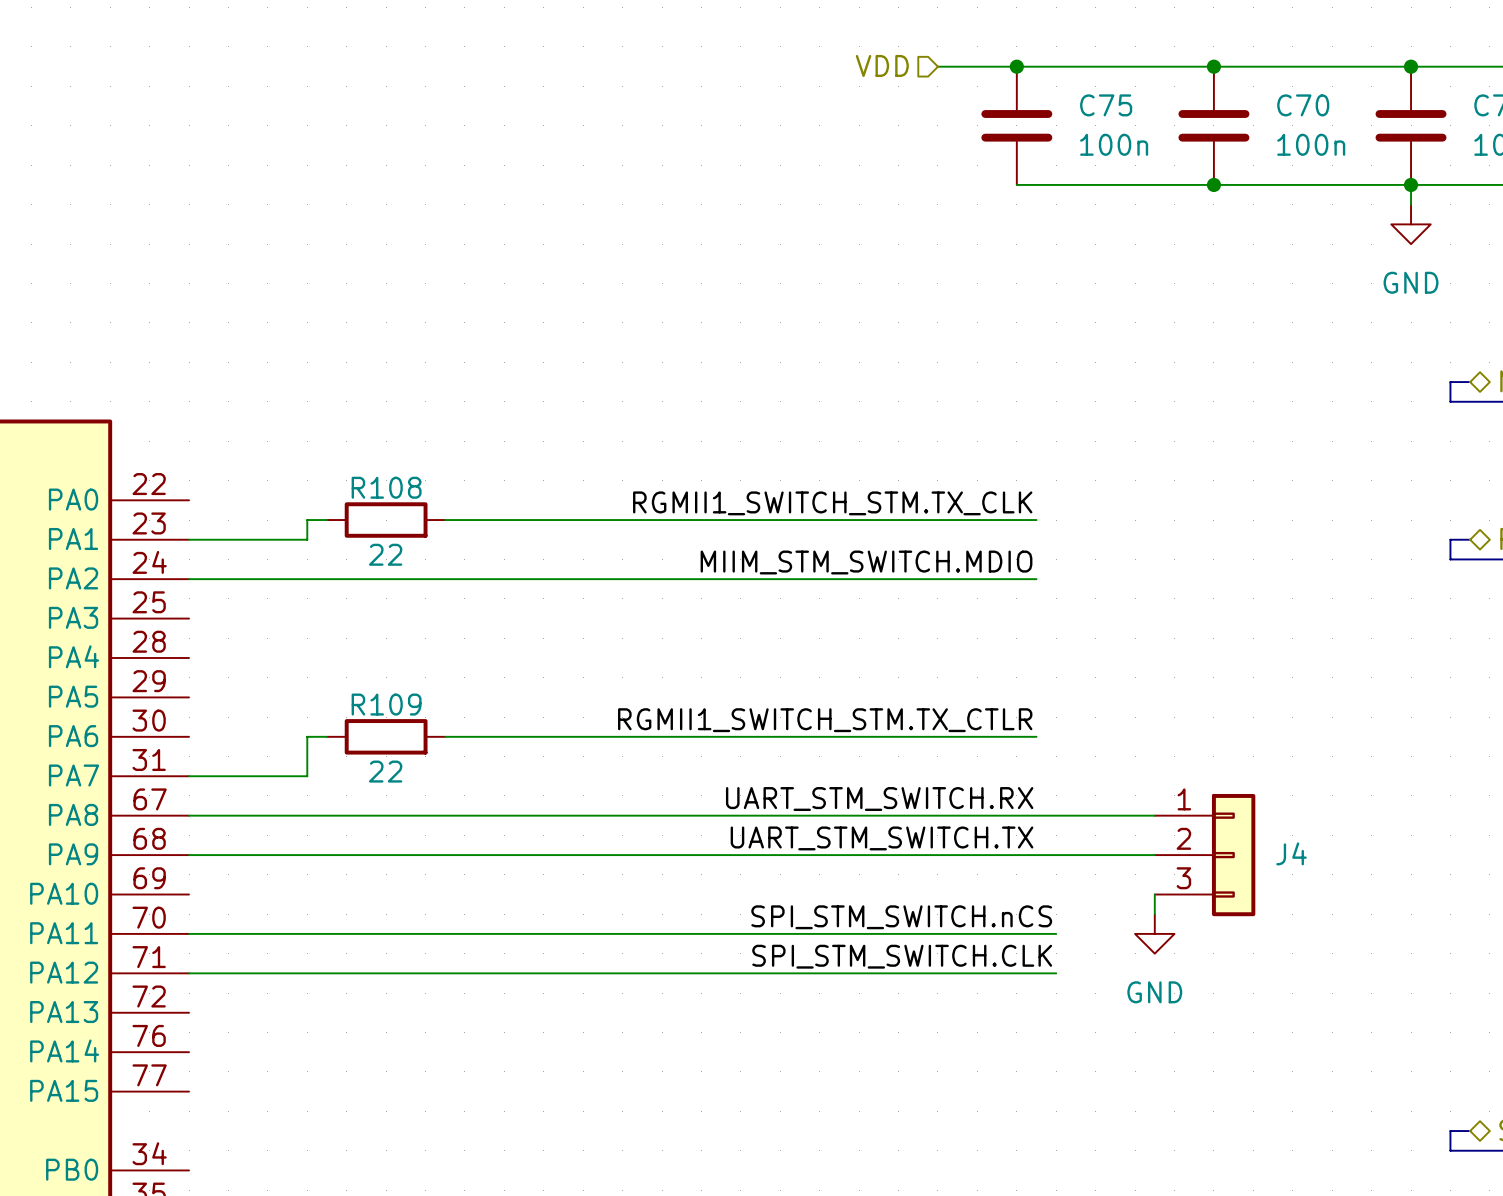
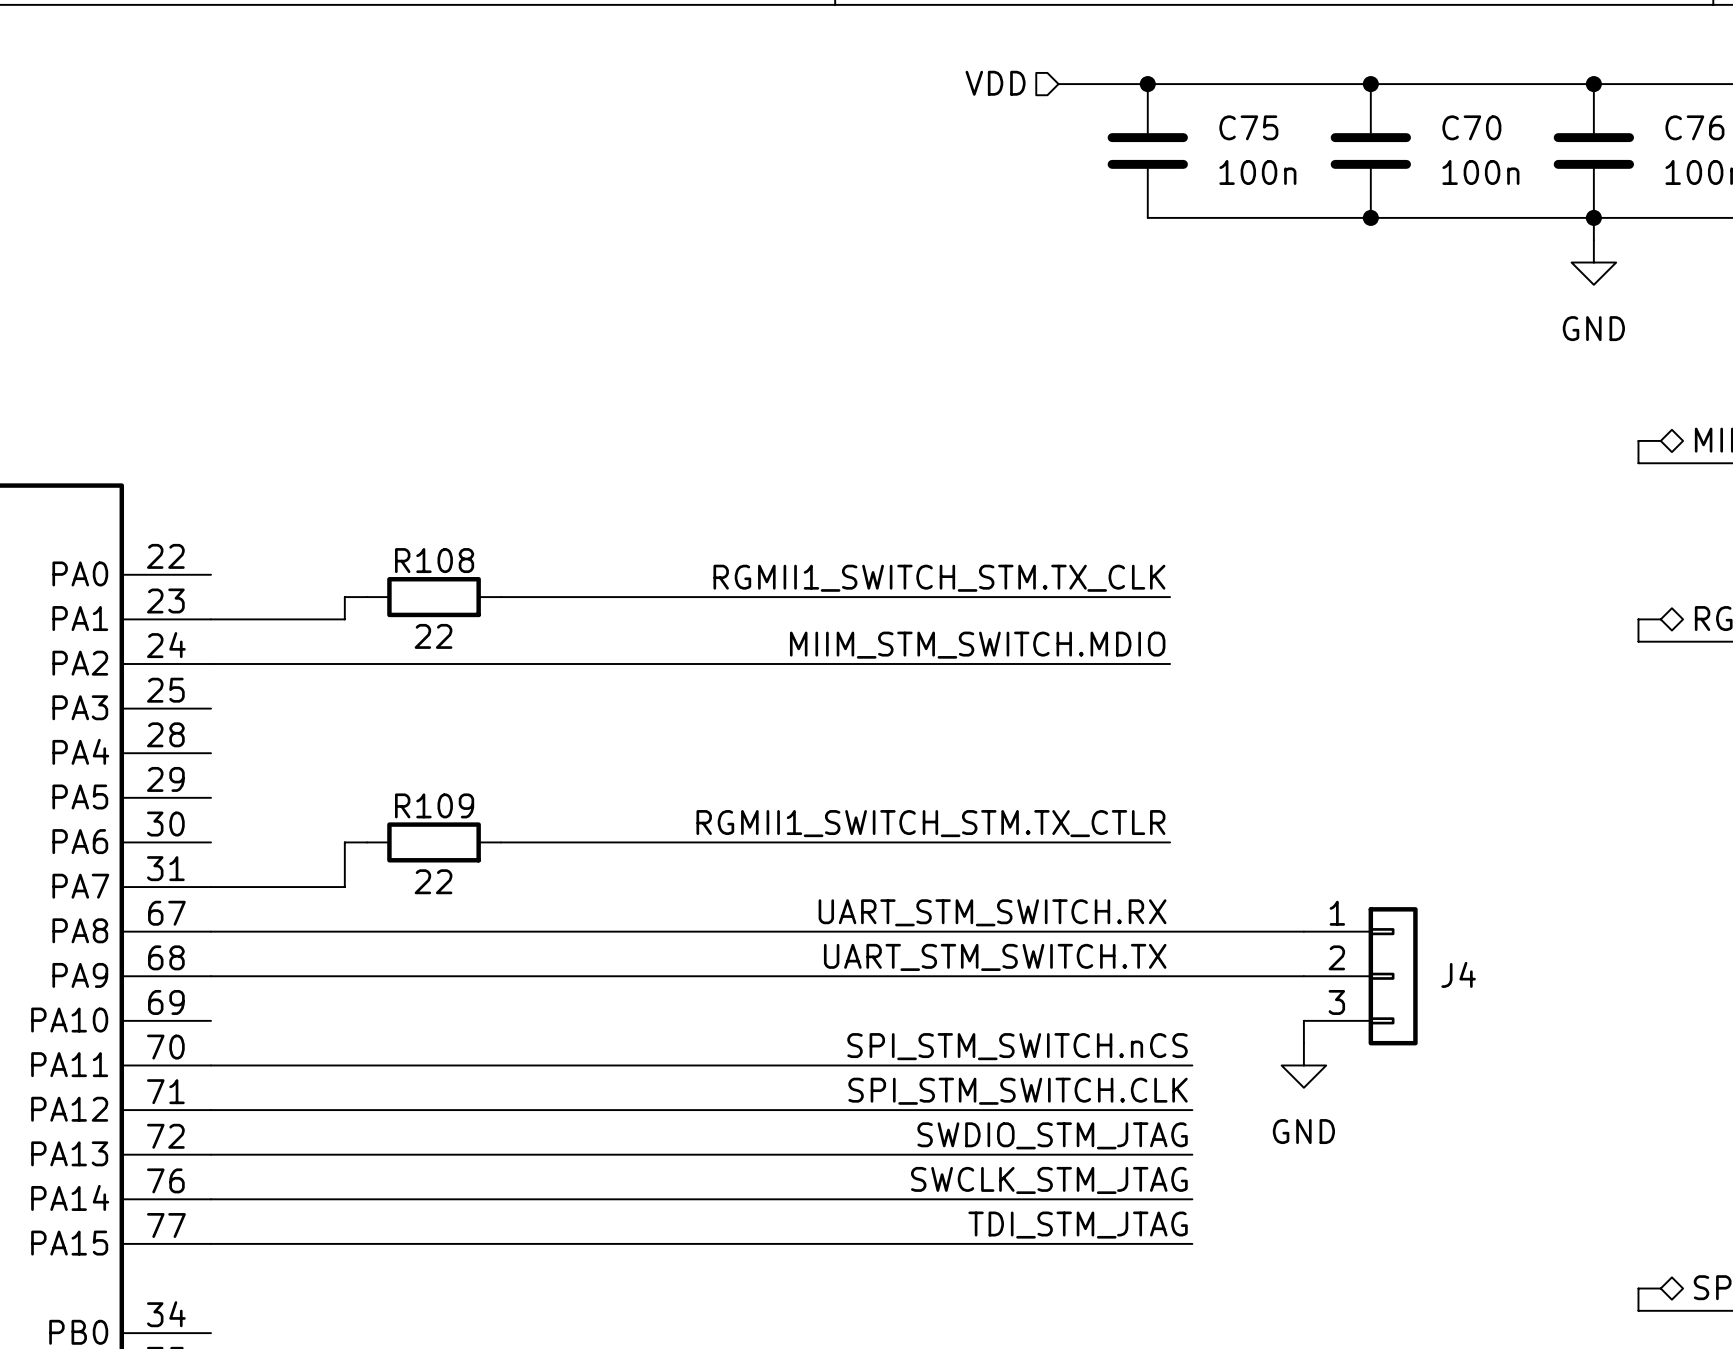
label: none -> SWDIO_STM_JTAG (1052, 1135)
wire: none -> (211, 1154) (1192, 1154)
label: none -> SWCLK_STM_JTAG (1049, 1180)
wire: none -> (211, 1199) (1192, 1199)
label: none -> TDI_STM_JTAG (1078, 1225)
wire: none -> (211, 1243) (1192, 1243)

